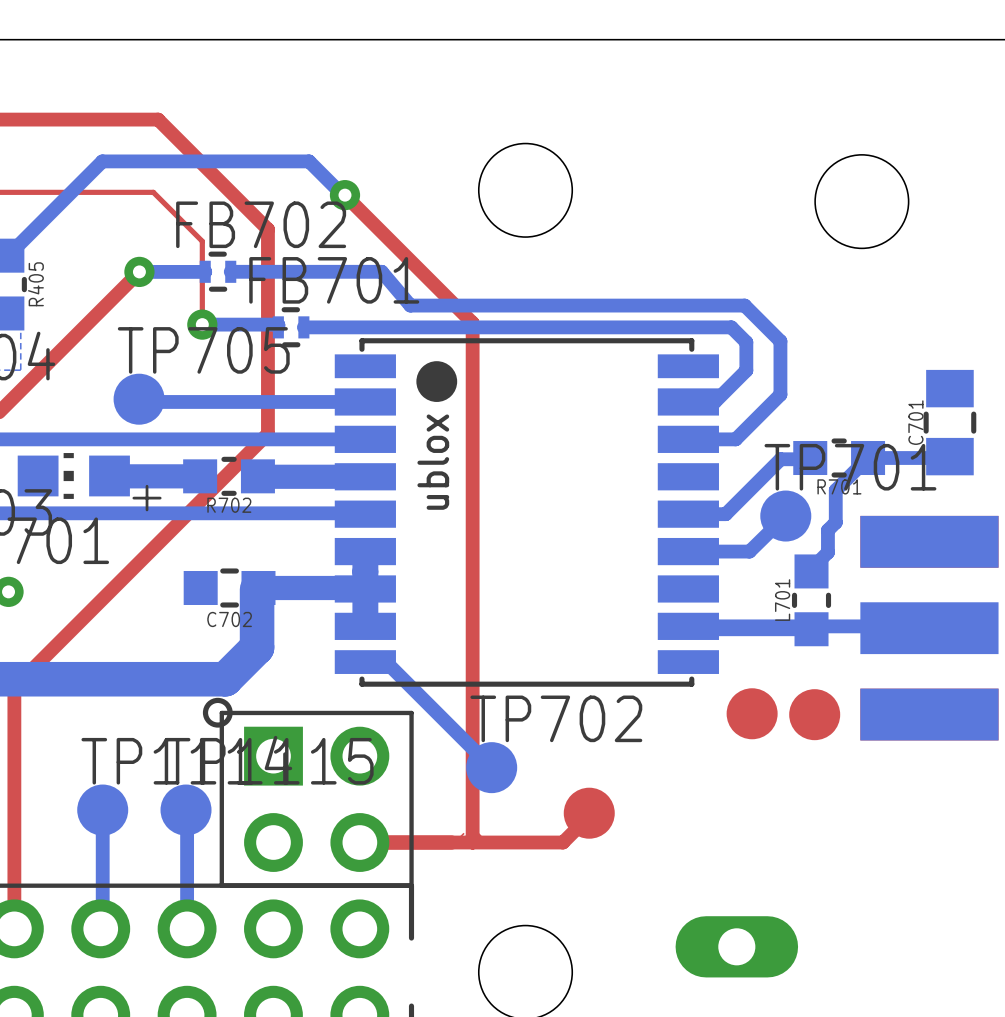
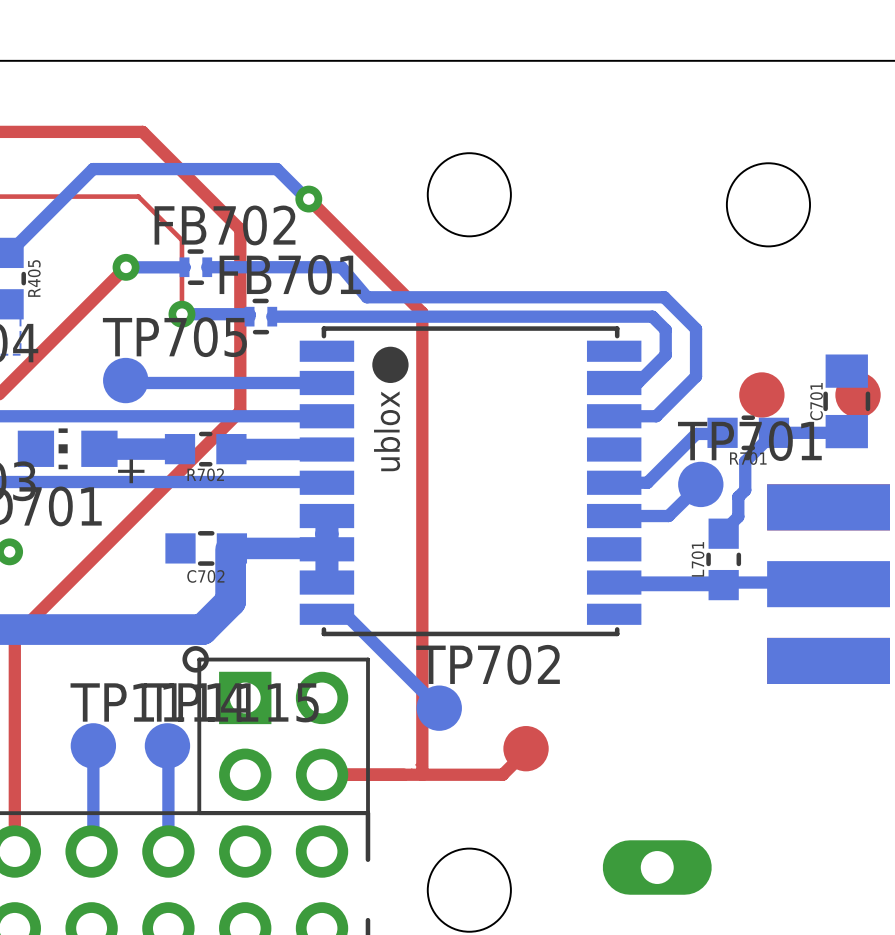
part: none -> (761, 394)
part: none -> (858, 394)
part: (752, 713) -> none
part: (814, 714) -> none

